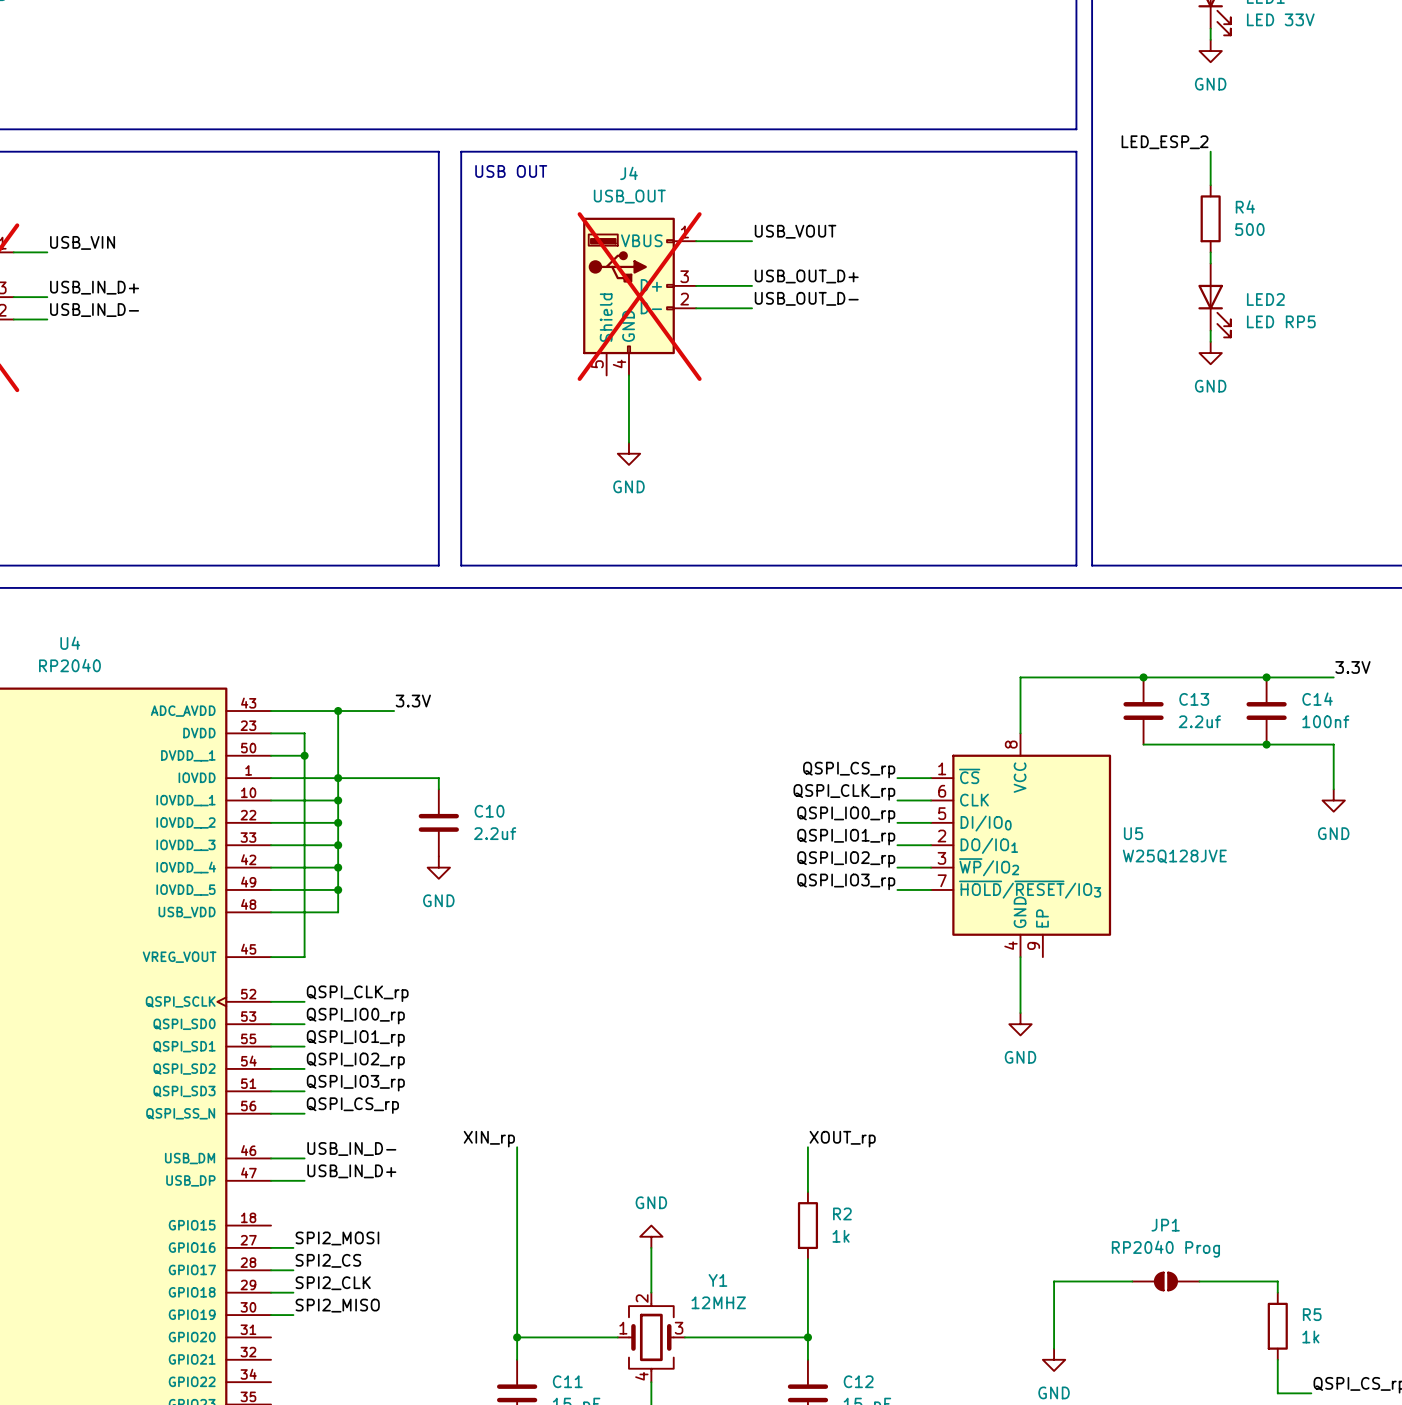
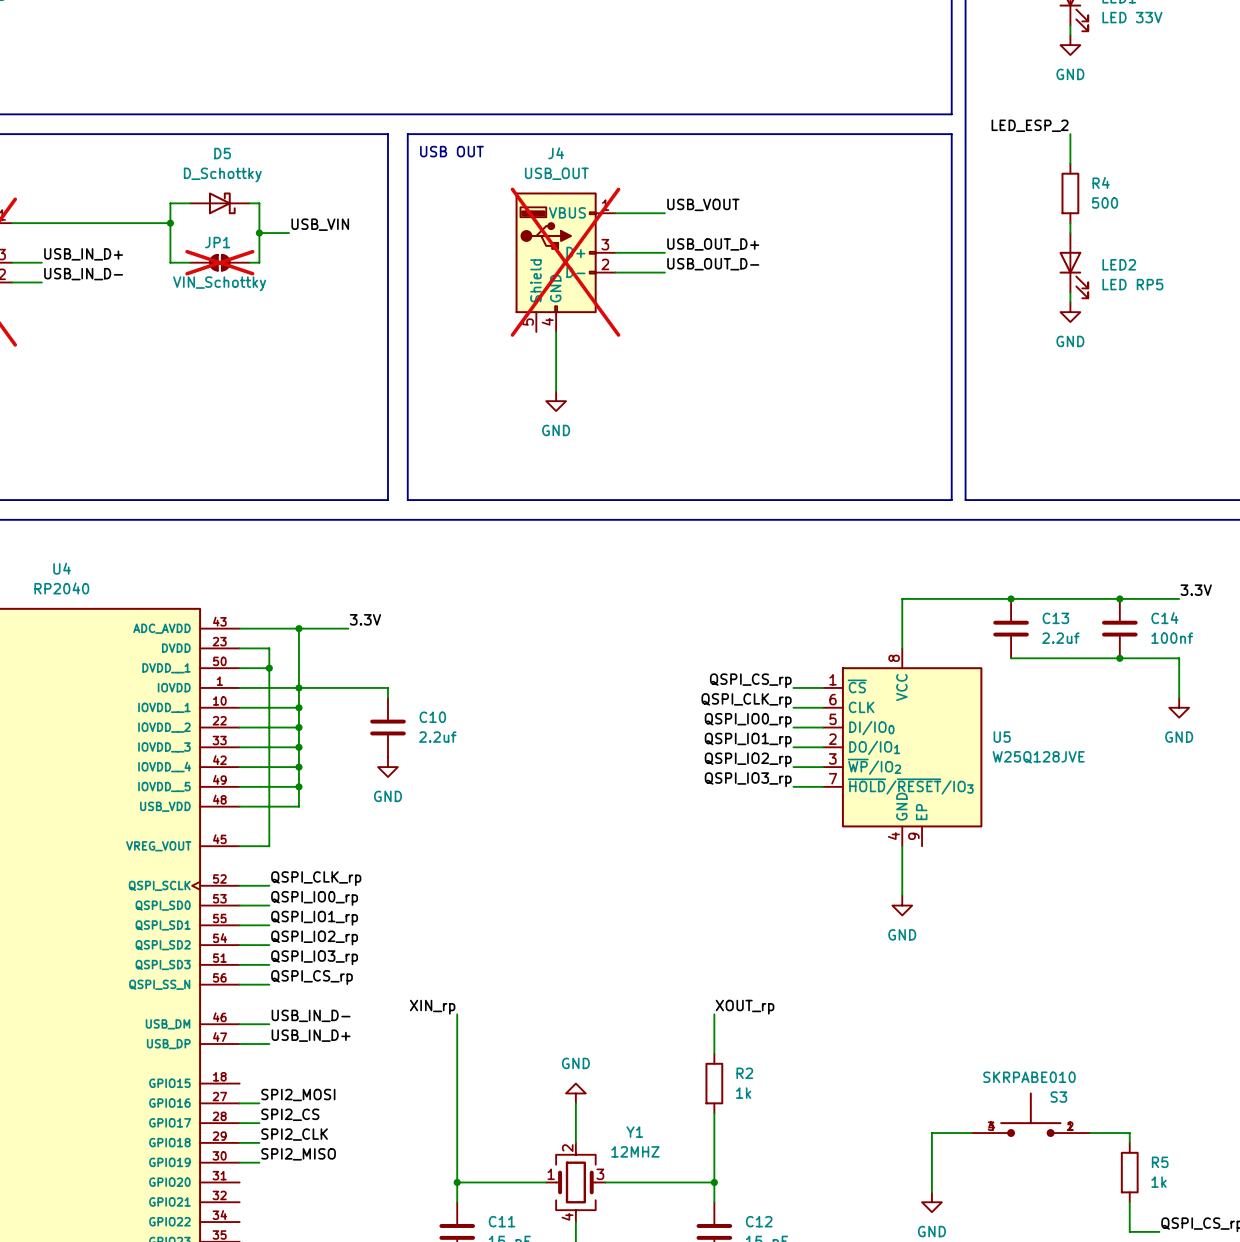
wire: none -> (190, 203) (170, 203) (170, 262) (190, 262)
D5: none -> D_Schottky (219, 203)
wire: none -> (249, 203) (259, 203) (259, 262) (249, 262)
label: USB_VIN (82, 242) -> none
wire: none -> (41, 223) (170, 223)
junction: none -> (170, 223)
label: none -> USB_VIN (320, 224)
wire: none -> (259, 233) (289, 233)
junction: none -> (259, 233)
JP1 do-not-place cross: none -> (219, 262)
JP1 name position: JP1 (1165, 1225) -> JP1 (217, 242)
JP1 value: RP2040 Prog (1165, 1249) -> VIN_Schottky (219, 283)
S3: none -> SKRPABE010 (1030, 1114)
JP1 position: (1165, 1281) -> (219, 262)

